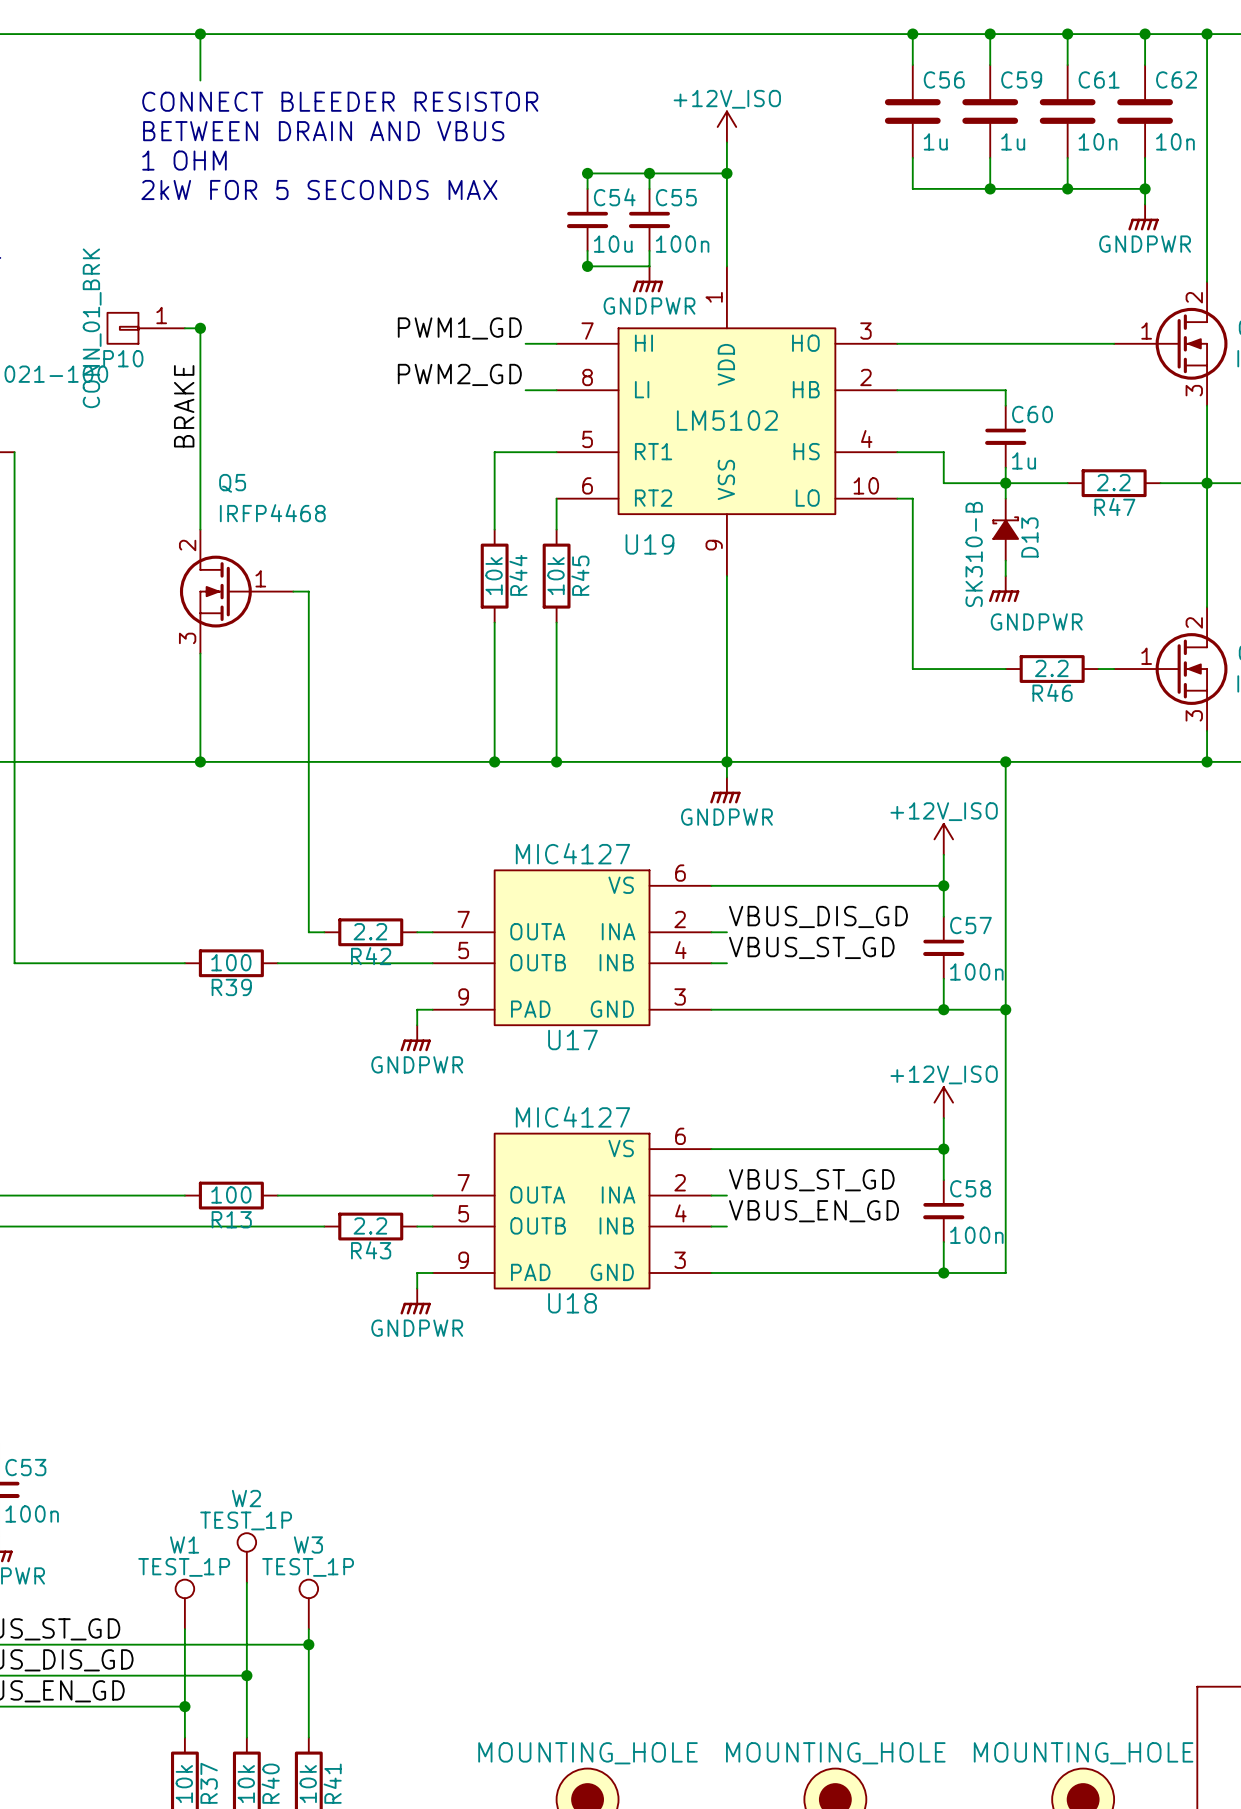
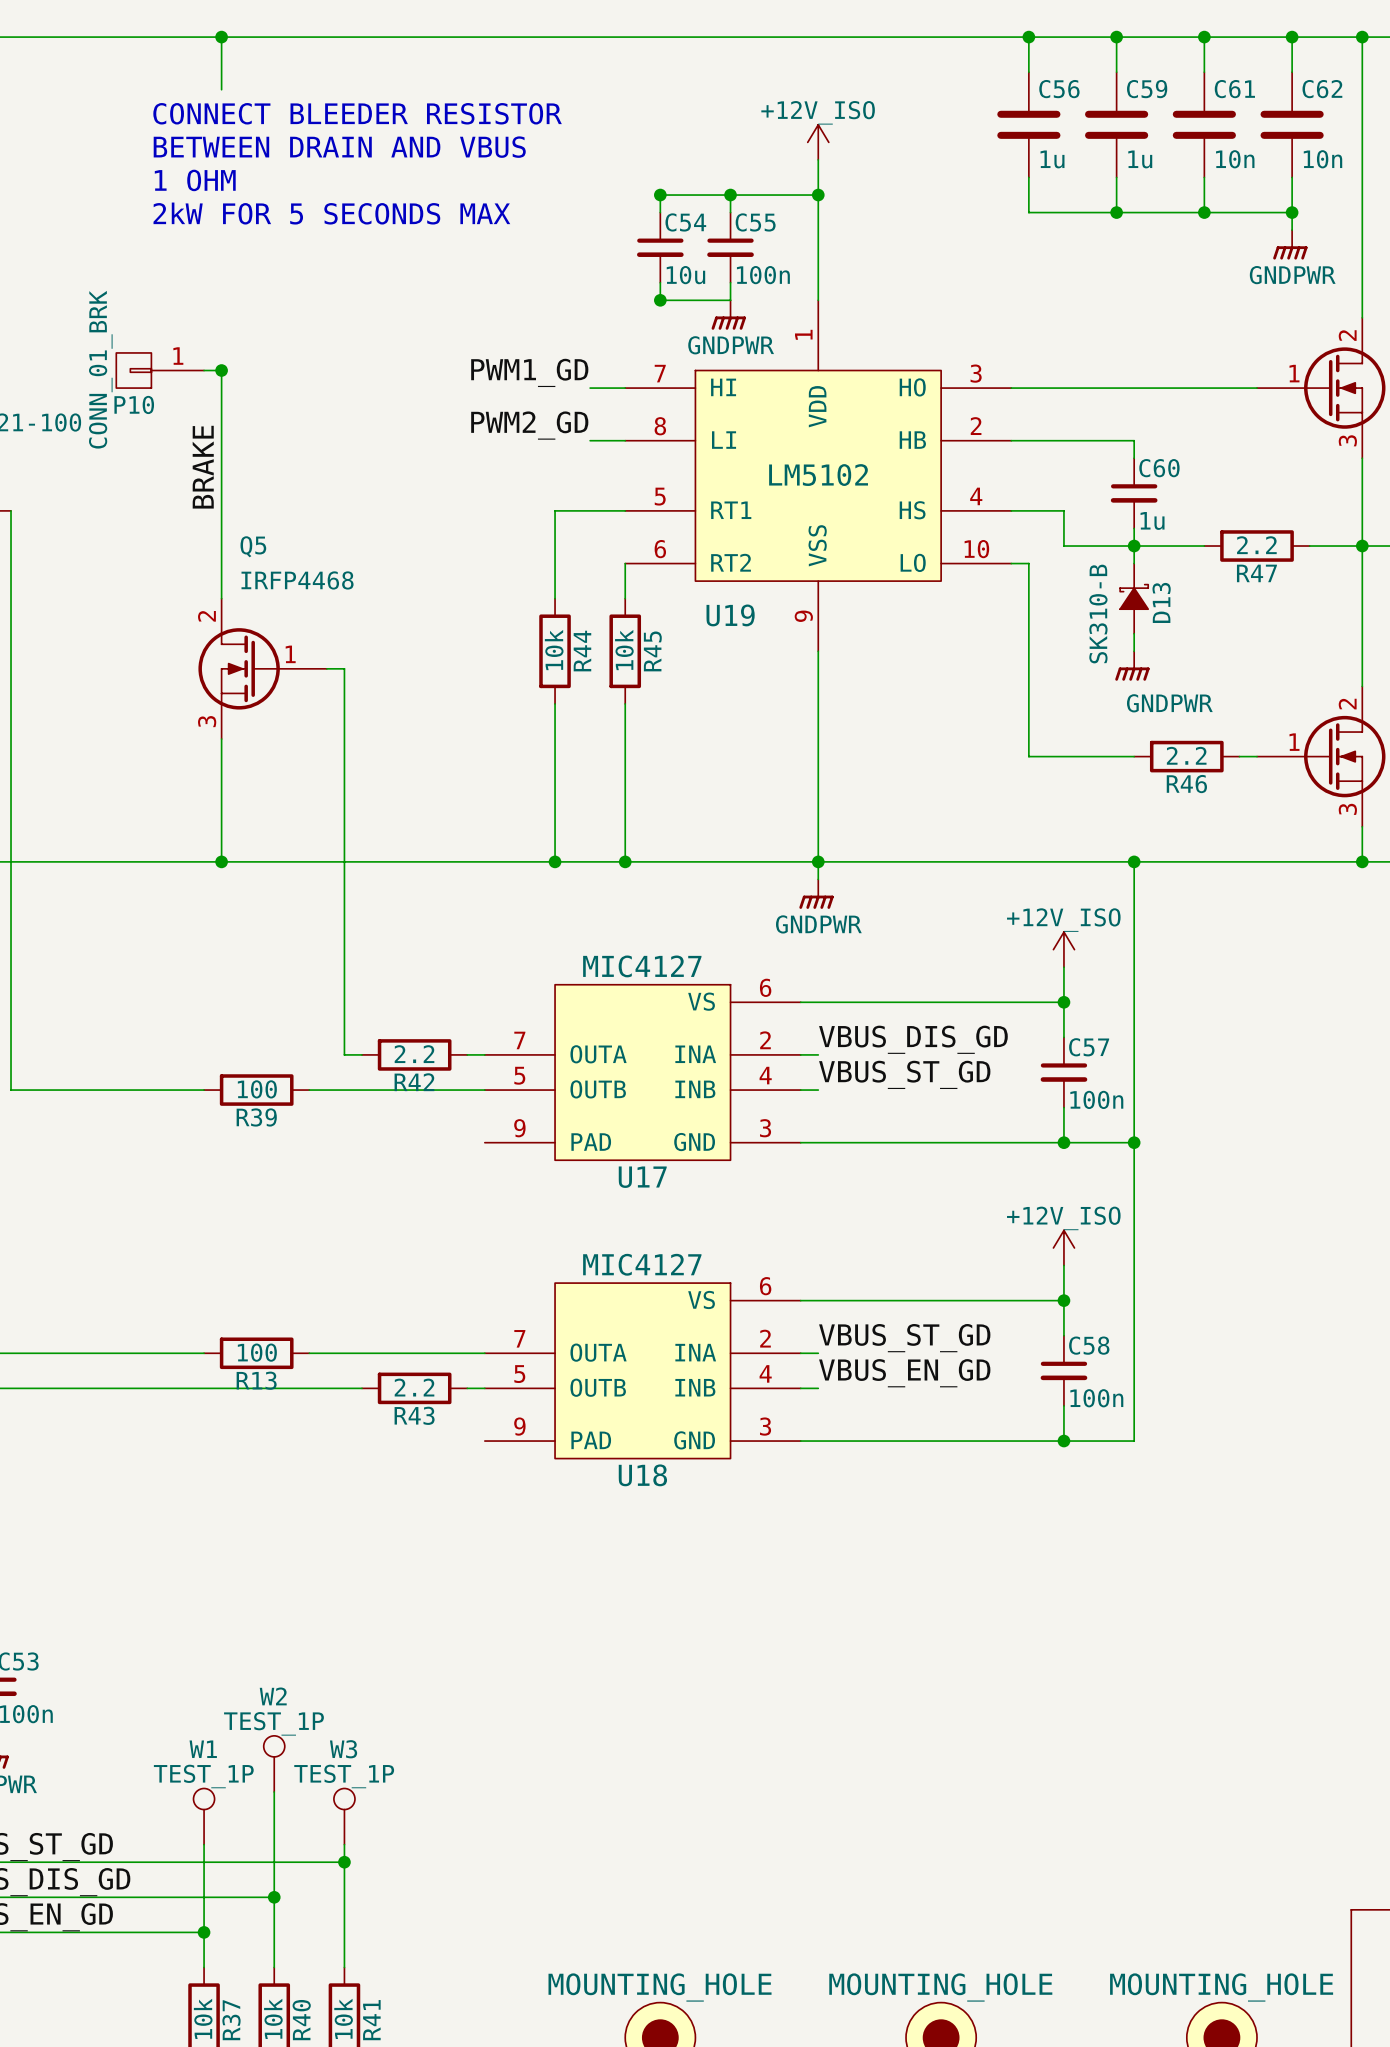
wire: (432, 1009) (417, 1009) (417, 1025) -> none
power symbol: GNDPWR (415, 1038) -> none
wire: (432, 1272) (417, 1272) (417, 1288) -> none
power symbol: GNDPWR (415, 1301) -> none

